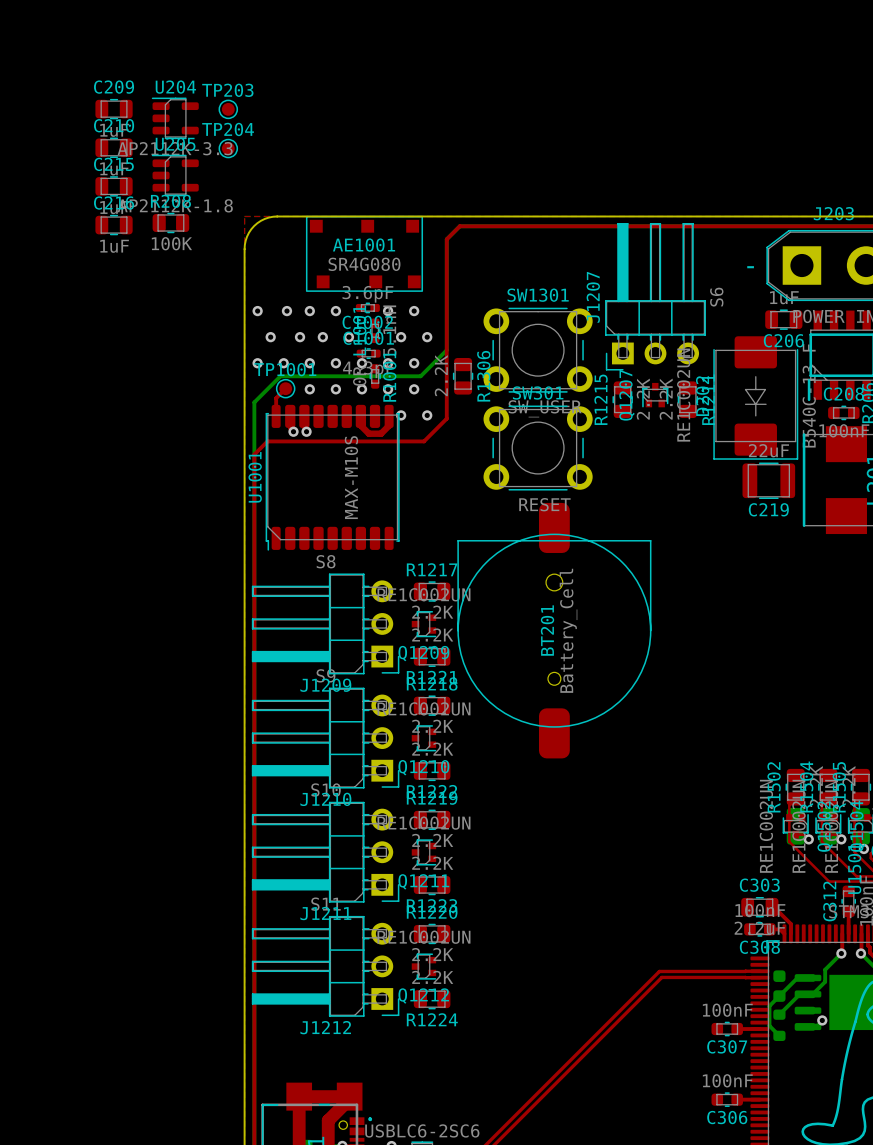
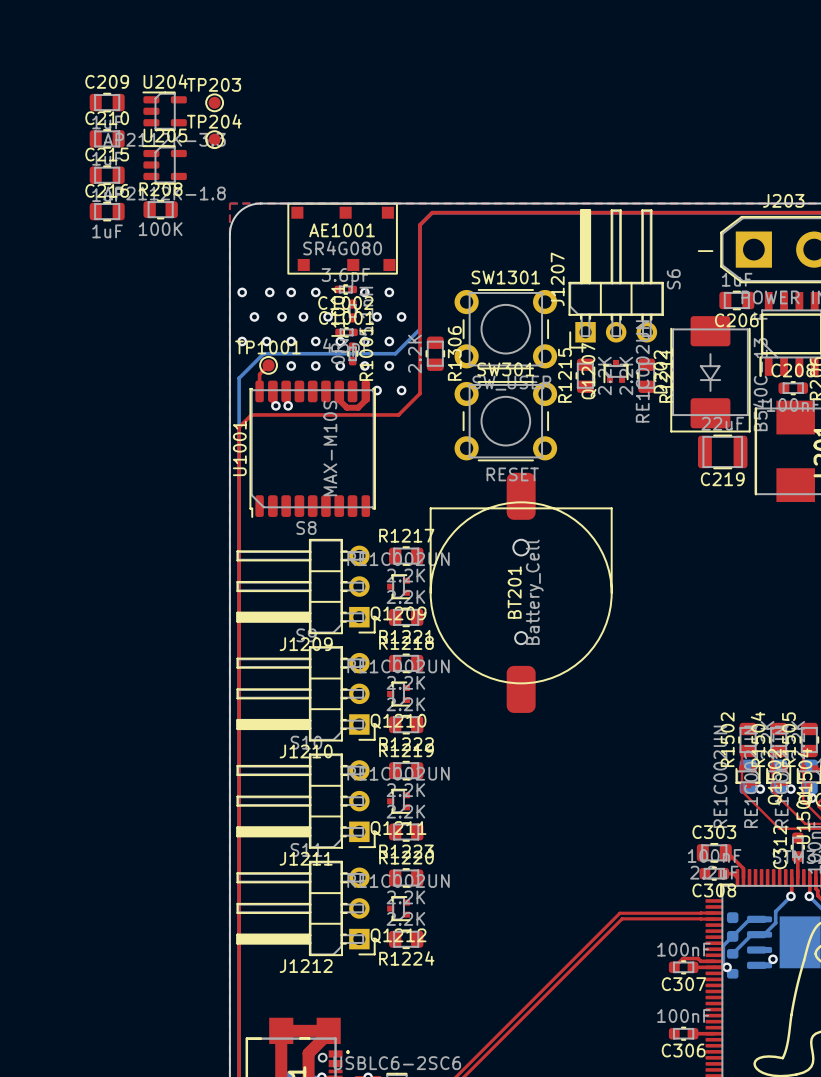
top track: none -> (714, 961) (683, 958) (674, 967)
via: none -> (727, 967)

